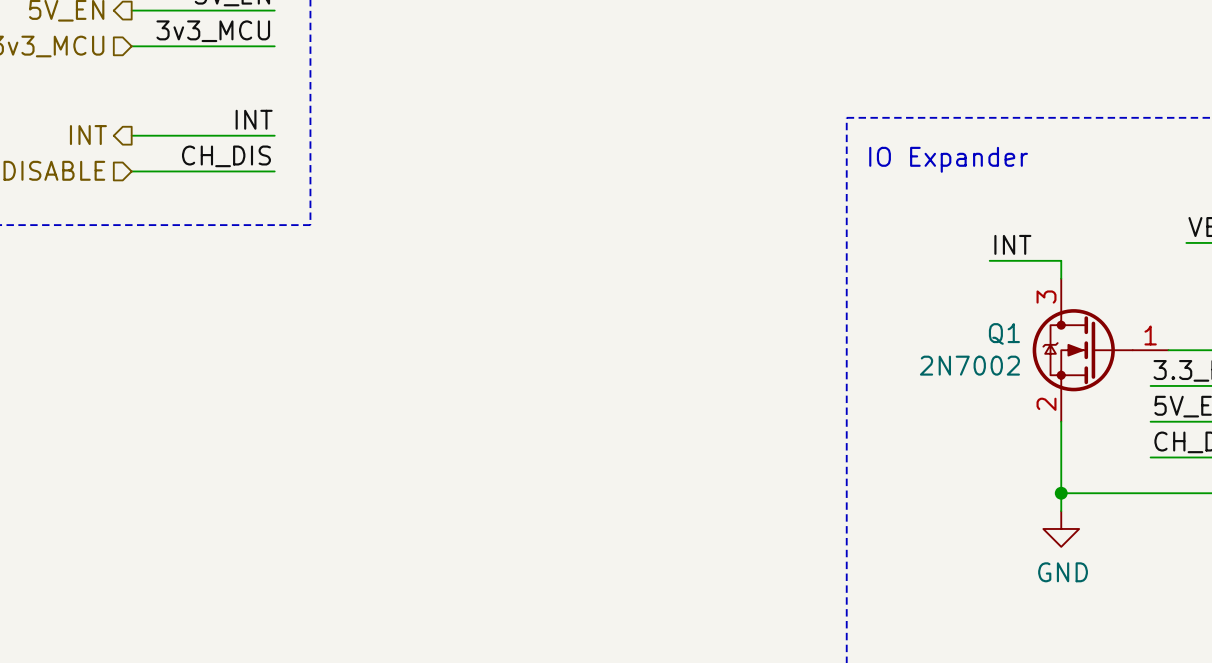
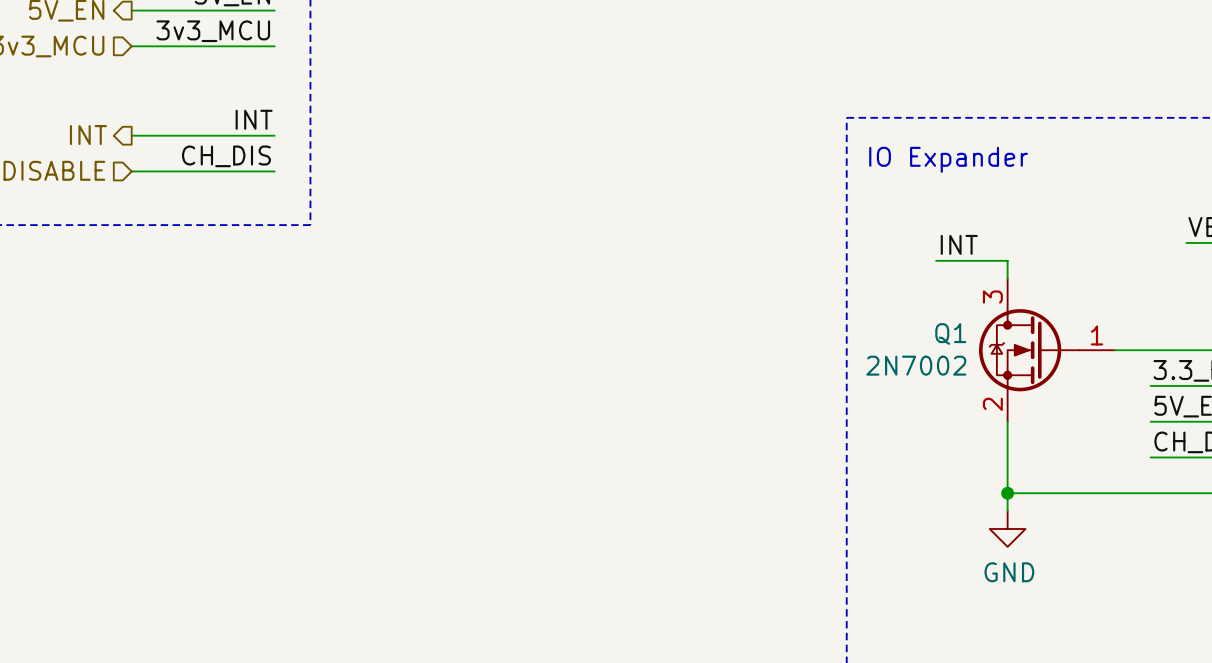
label position: INT (1012, 244) -> INT (959, 244)
wire: none -> (936, 260) (989, 260)
wire: (1007, 260) (1061, 260) (1061, 278) -> (1007, 260) (1007, 278)
Q1 position: (1100, 350) -> (1046, 350)
wire: (1061, 421) (1061, 511) -> (1007, 421) (1007, 511)
wire: none -> (1007, 493) (1061, 493)
junction position: (1061, 493) -> (1007, 493)
power symbol position: GND (1061, 528) -> GND (1007, 528)

